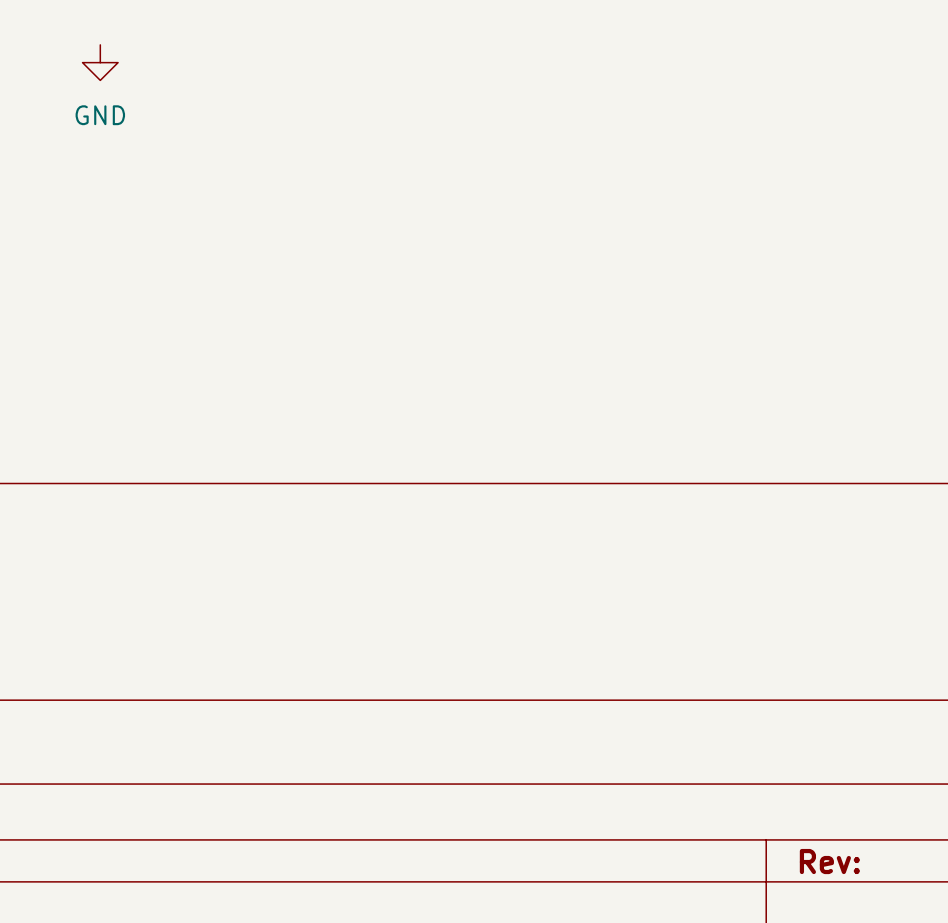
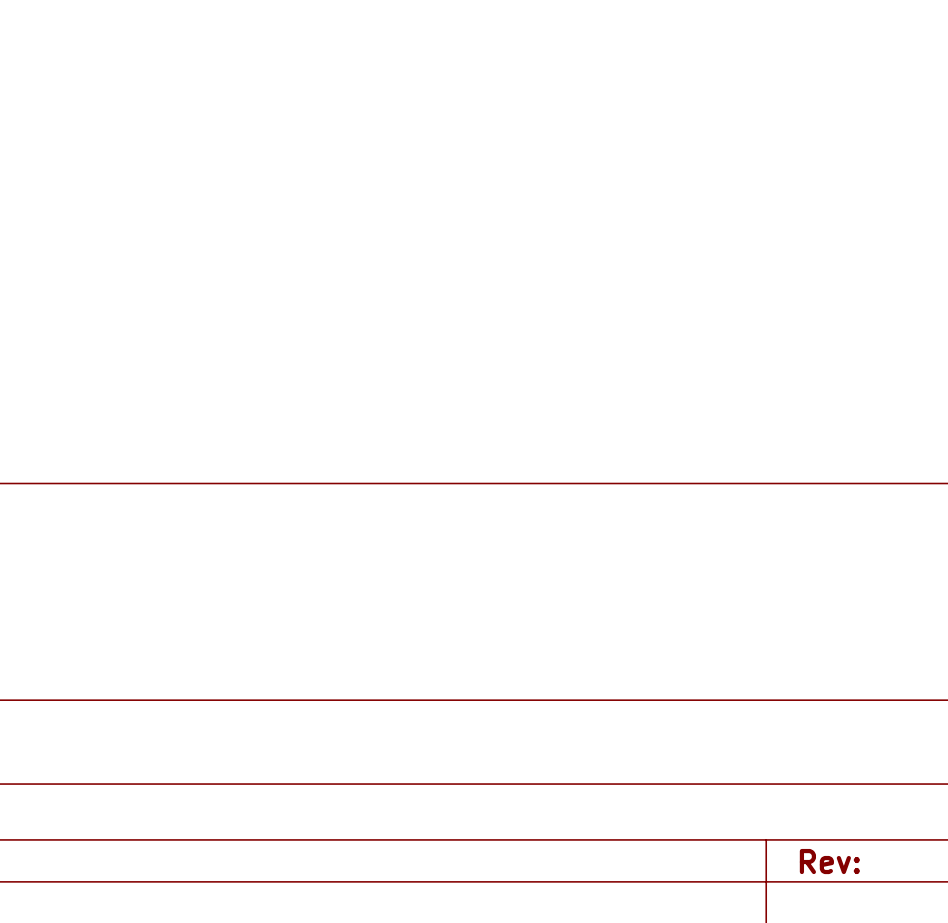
power symbol: GND (100, 62) -> none

